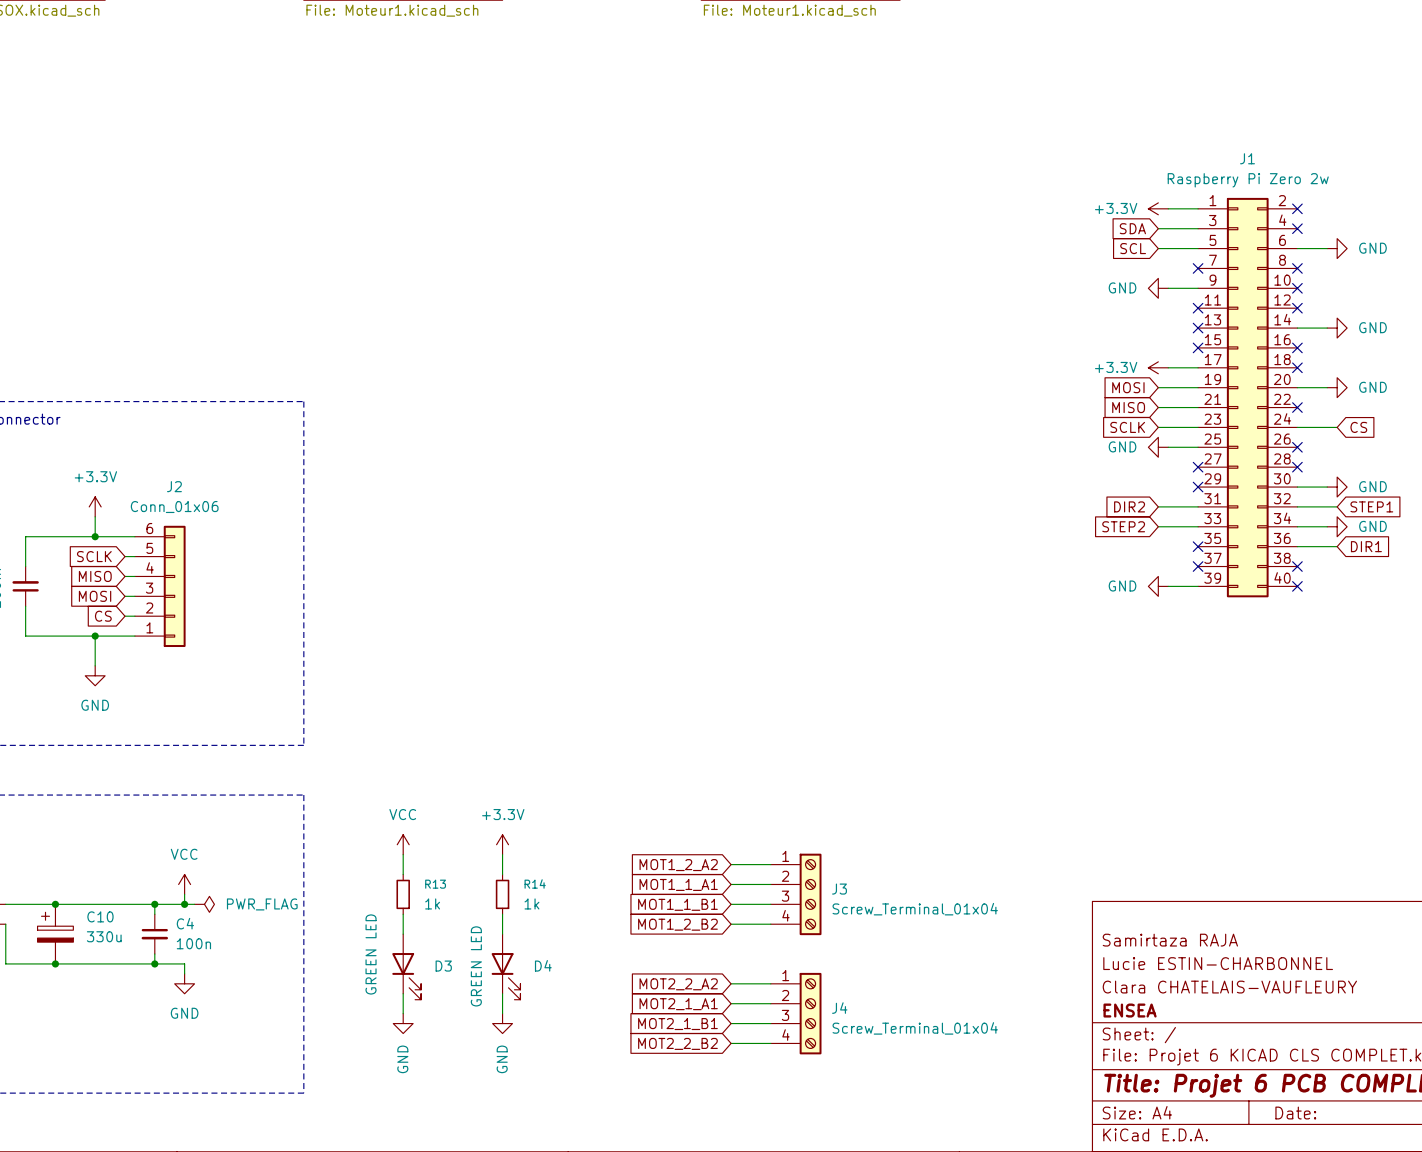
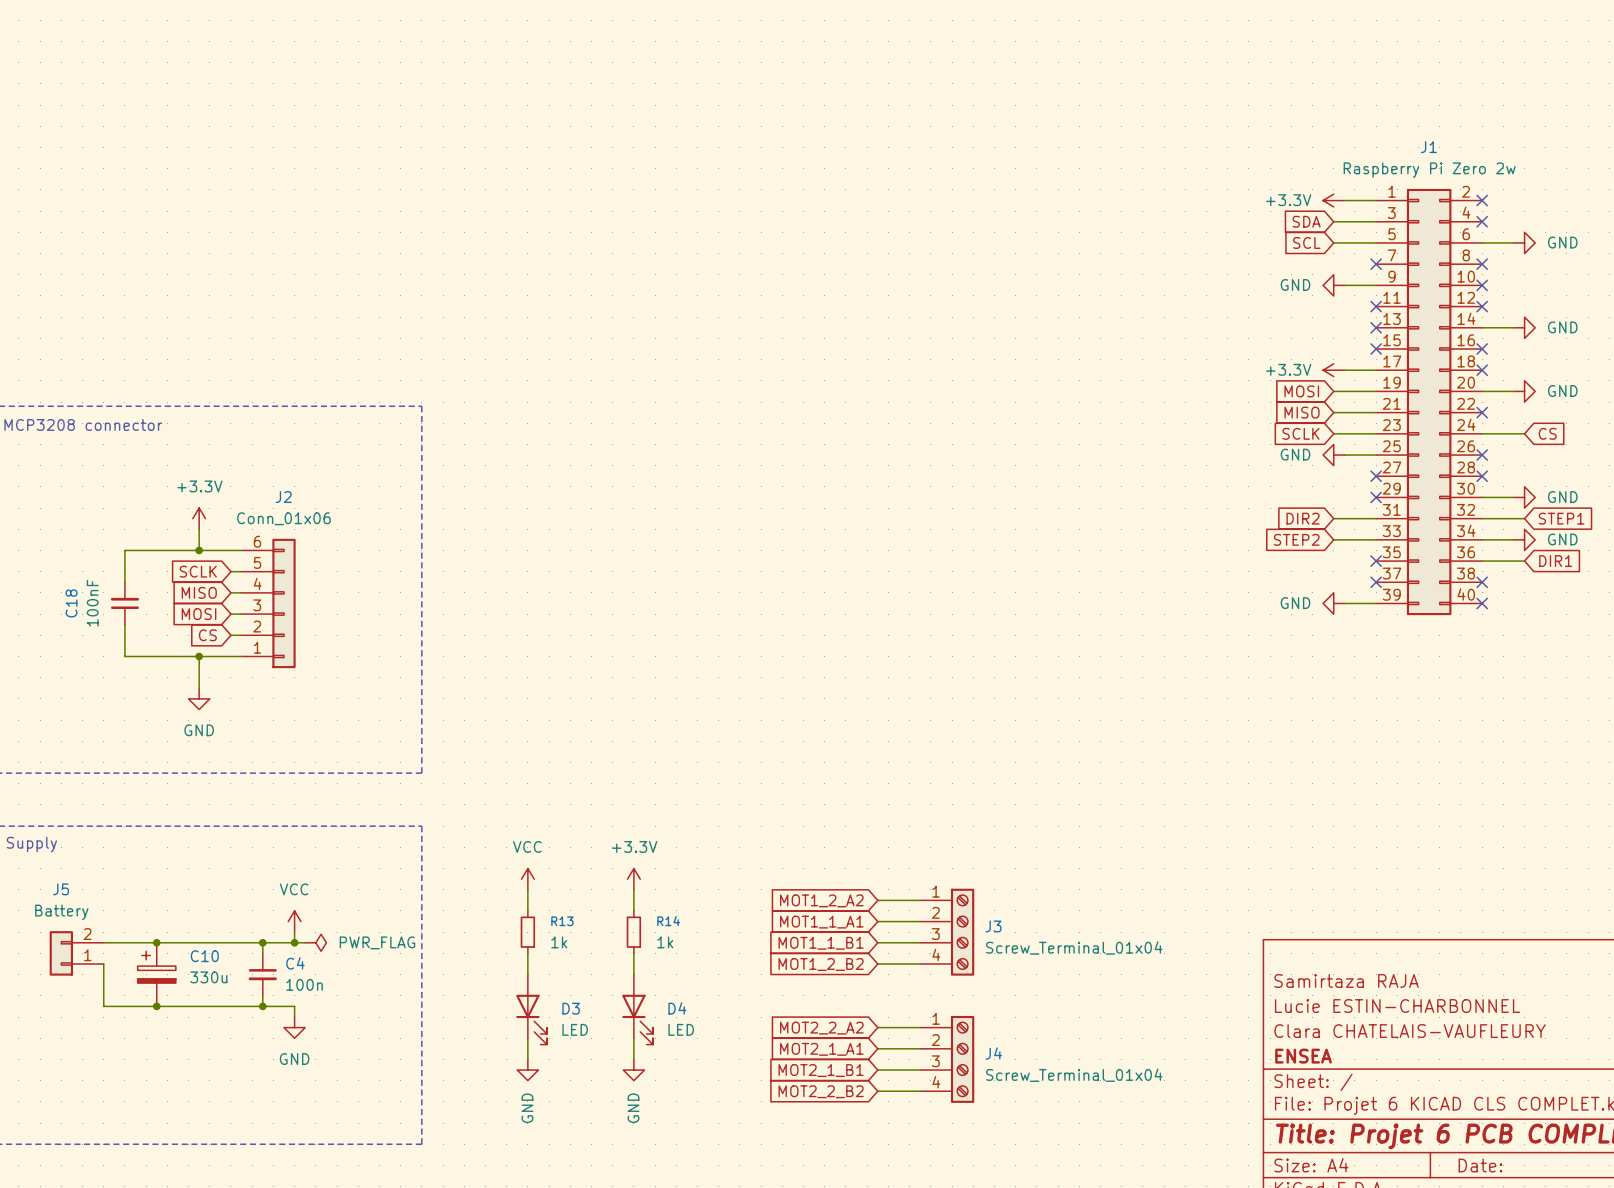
D3 value: GREEN LED (371, 954) -> LED (575, 1029)
D4 value: GREEN LED (476, 966) -> LED (681, 1029)

